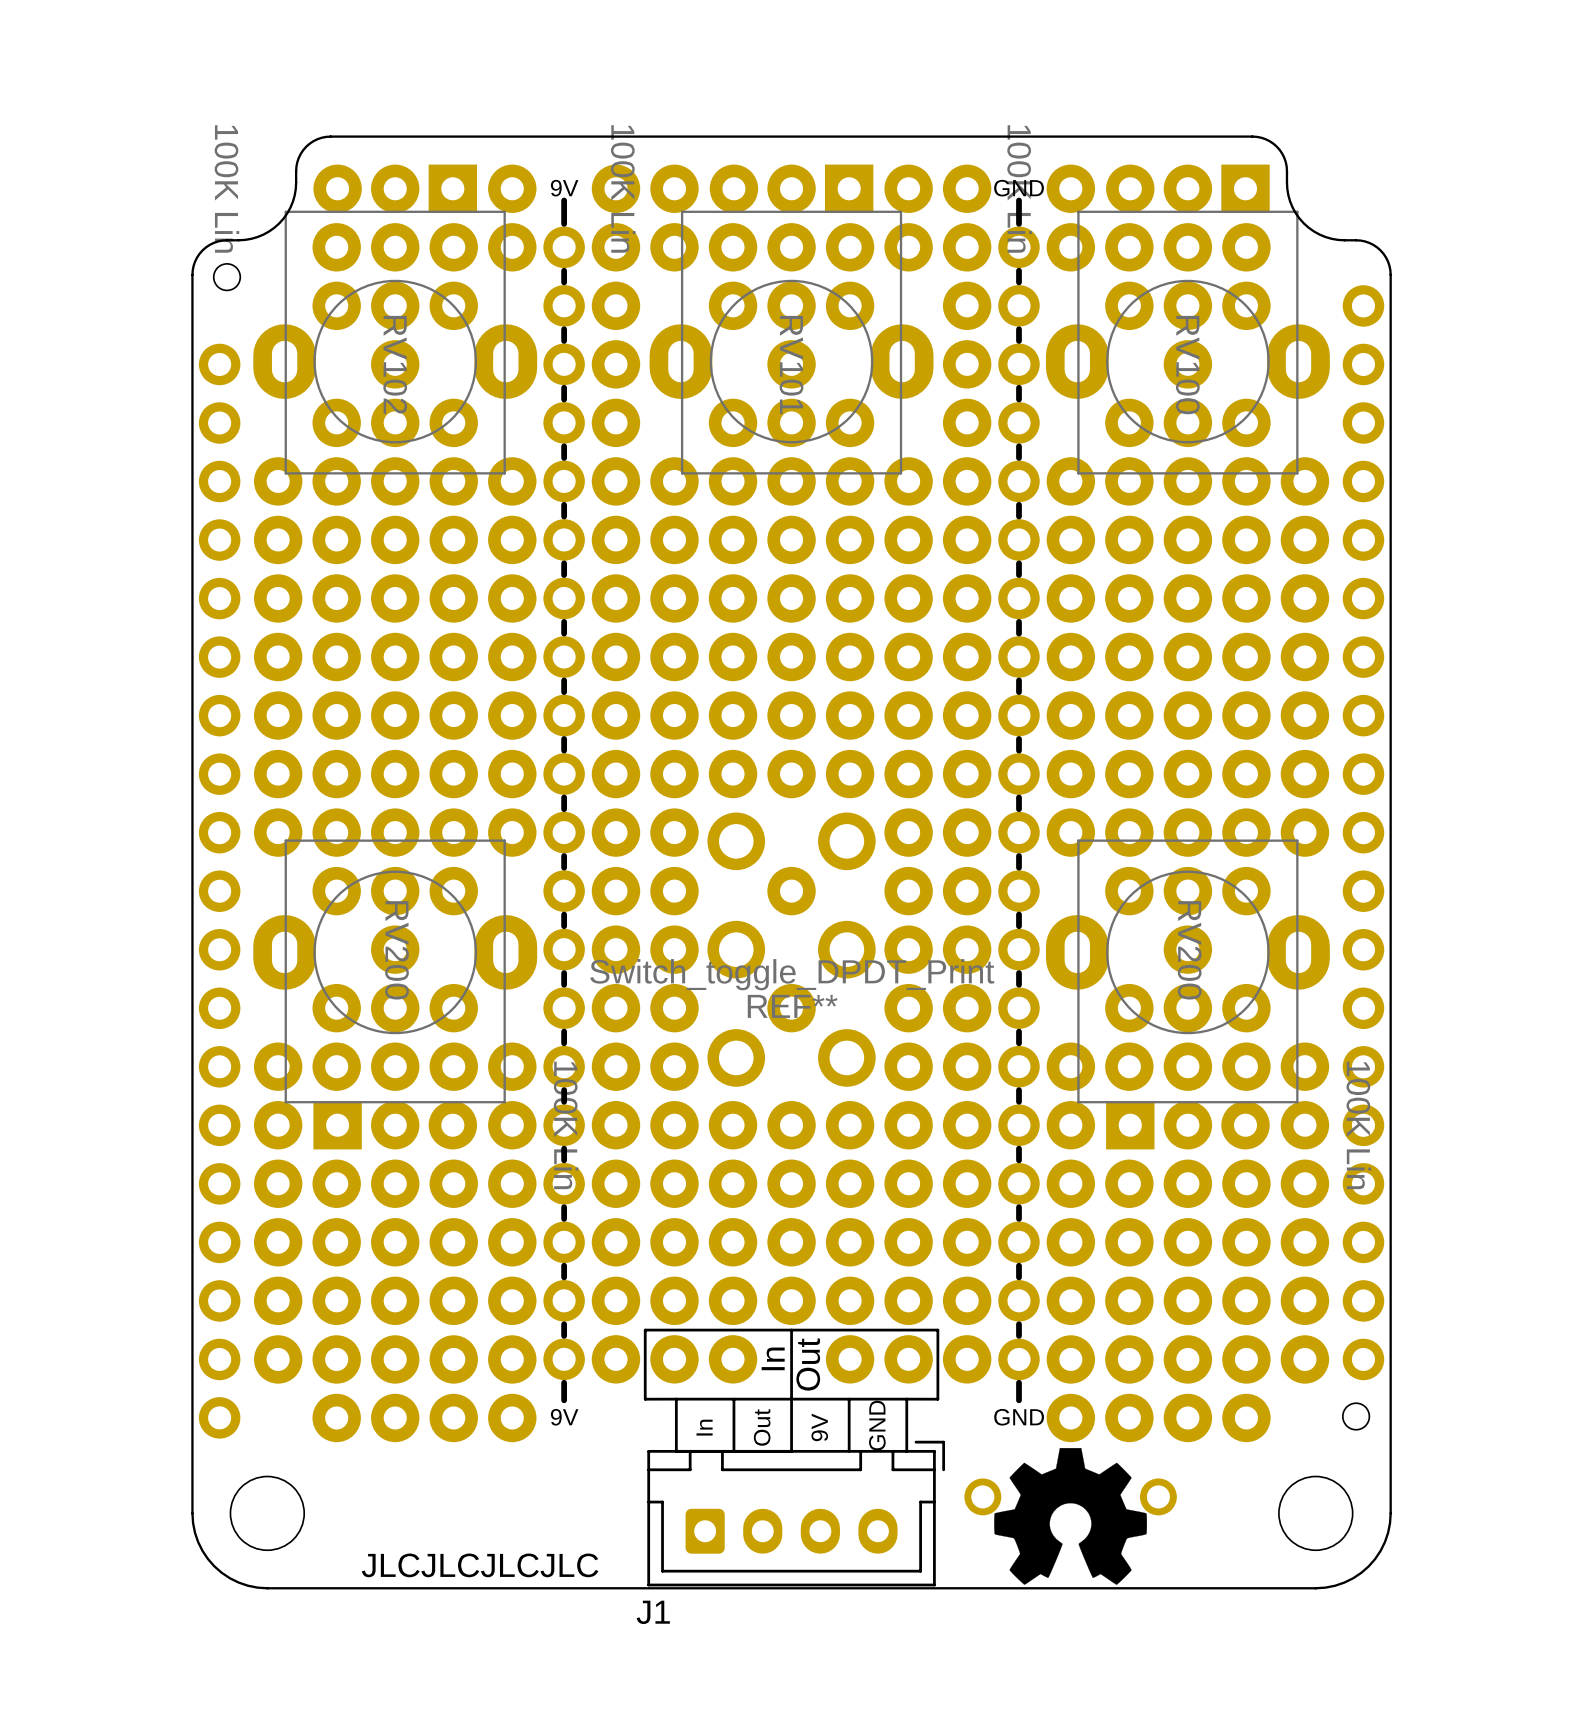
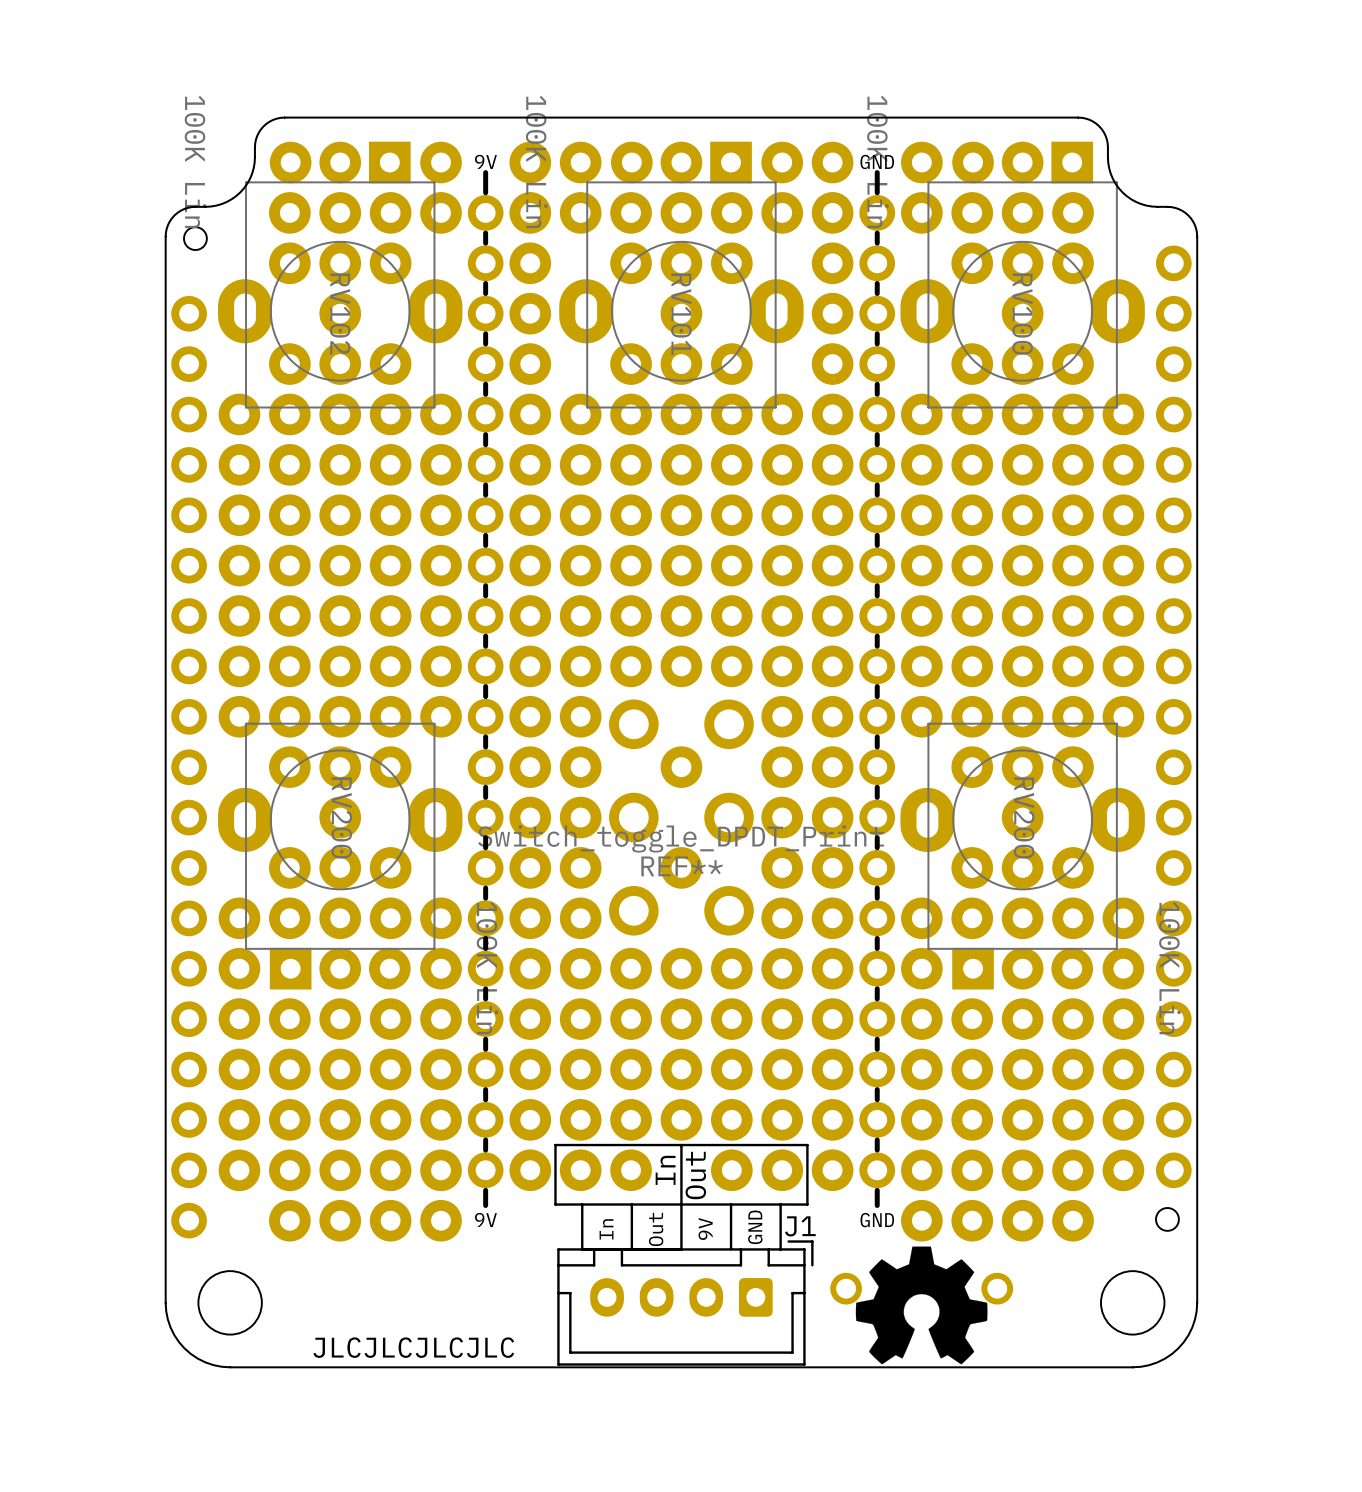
J1 rotation: 0° (791, 1531) -> 180° (681, 1297)

